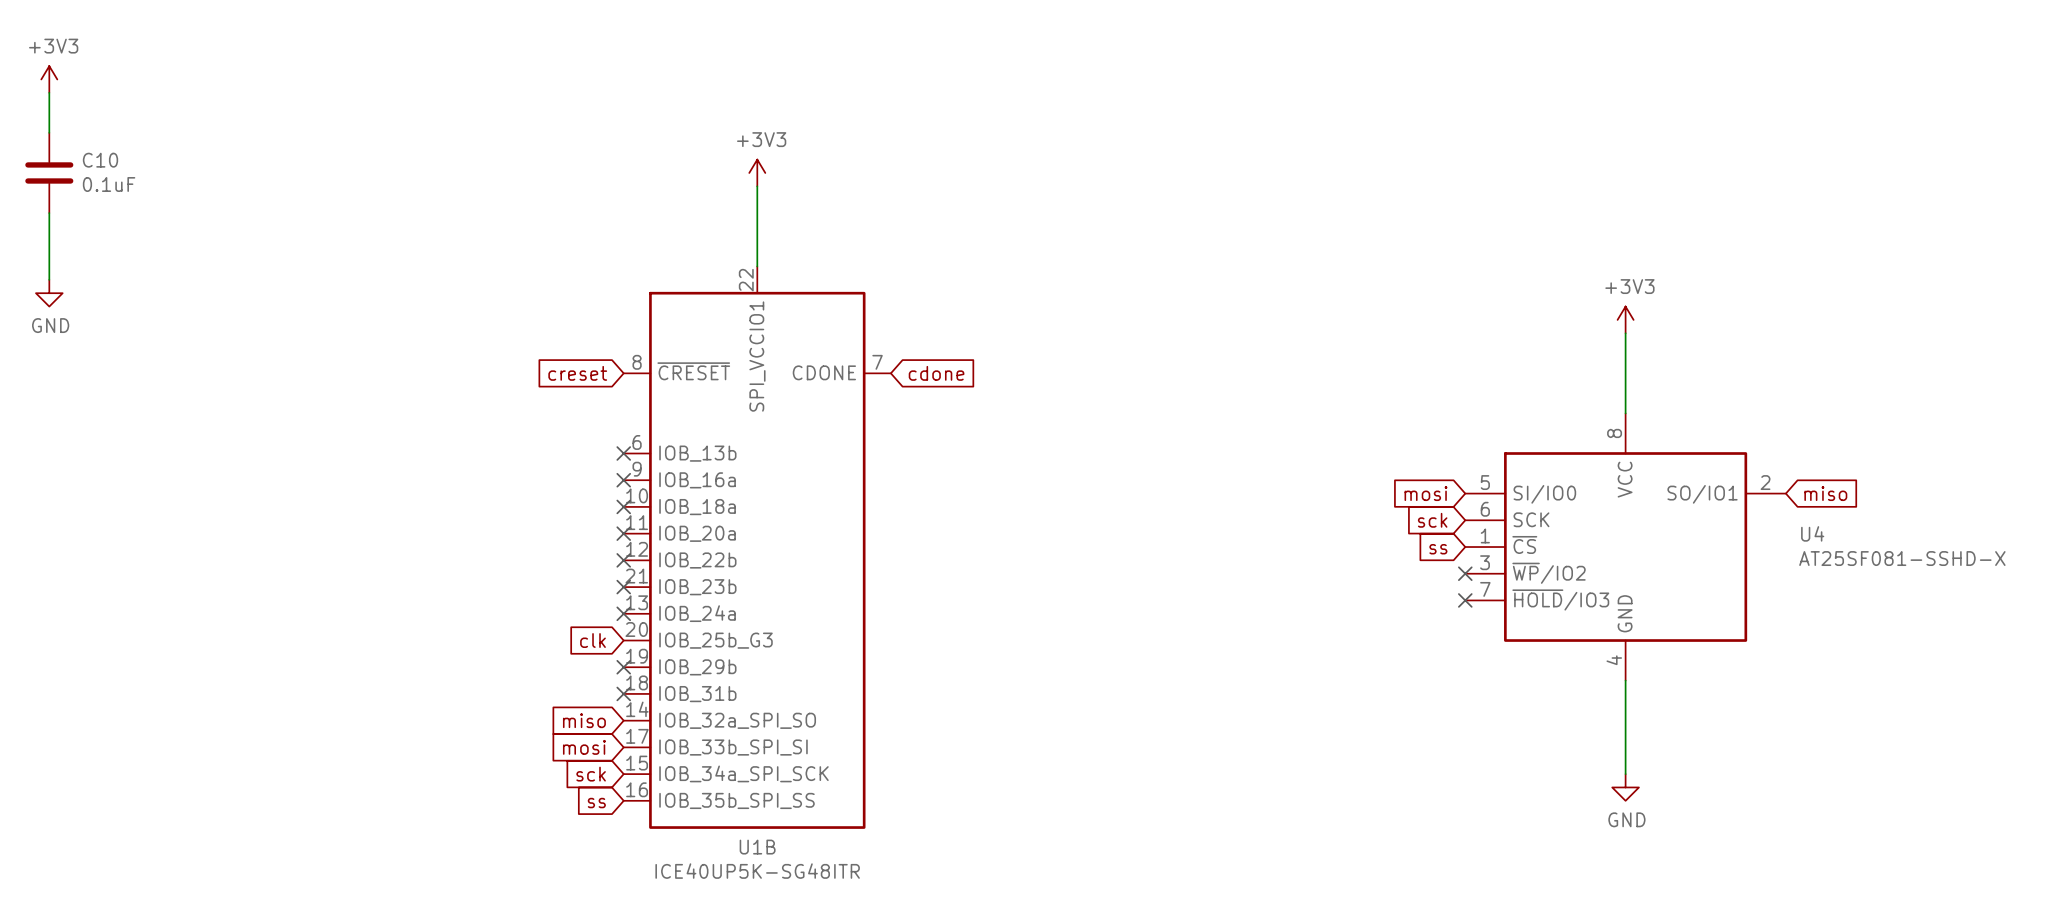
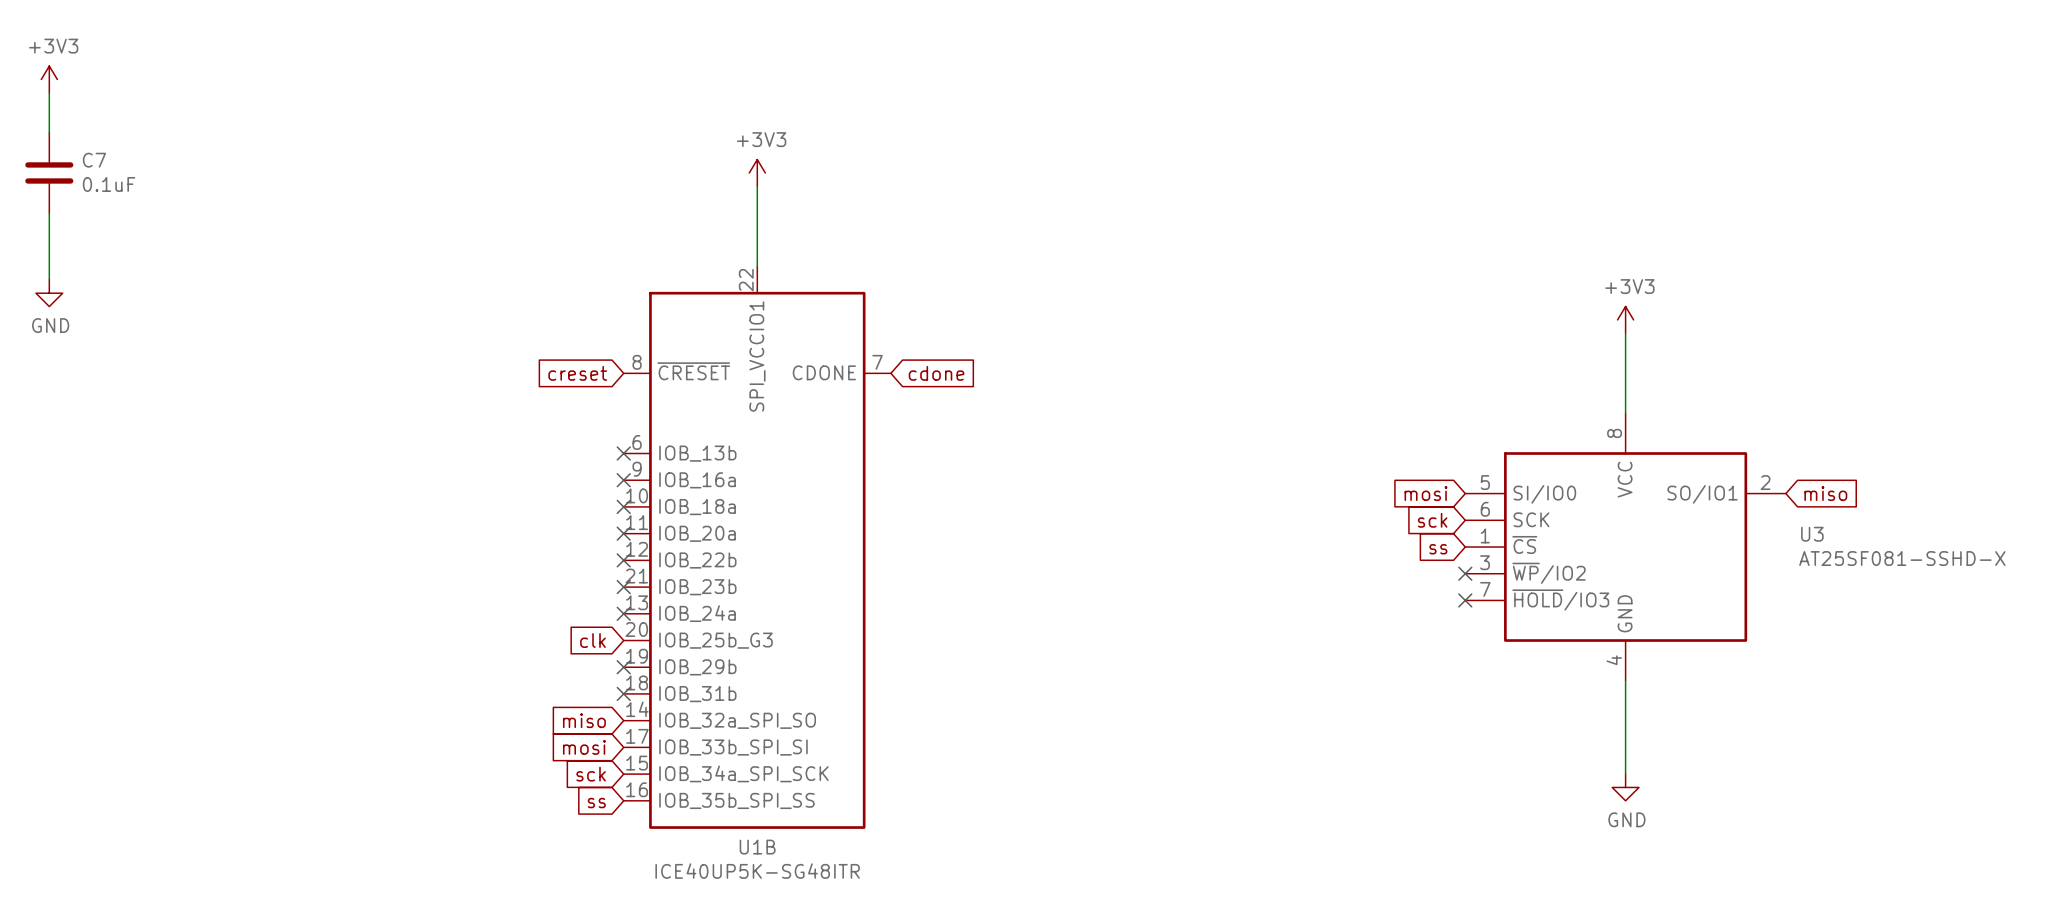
C10 name: C10 (100, 160) -> C7 (94, 160)
U4 name: U4 (1812, 533) -> U3 (1812, 534)

